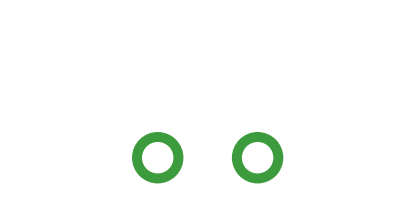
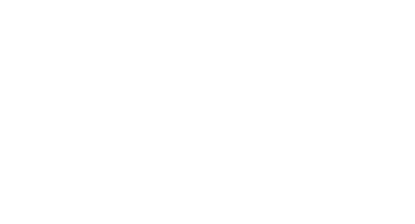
part: (207, 157) -> none

